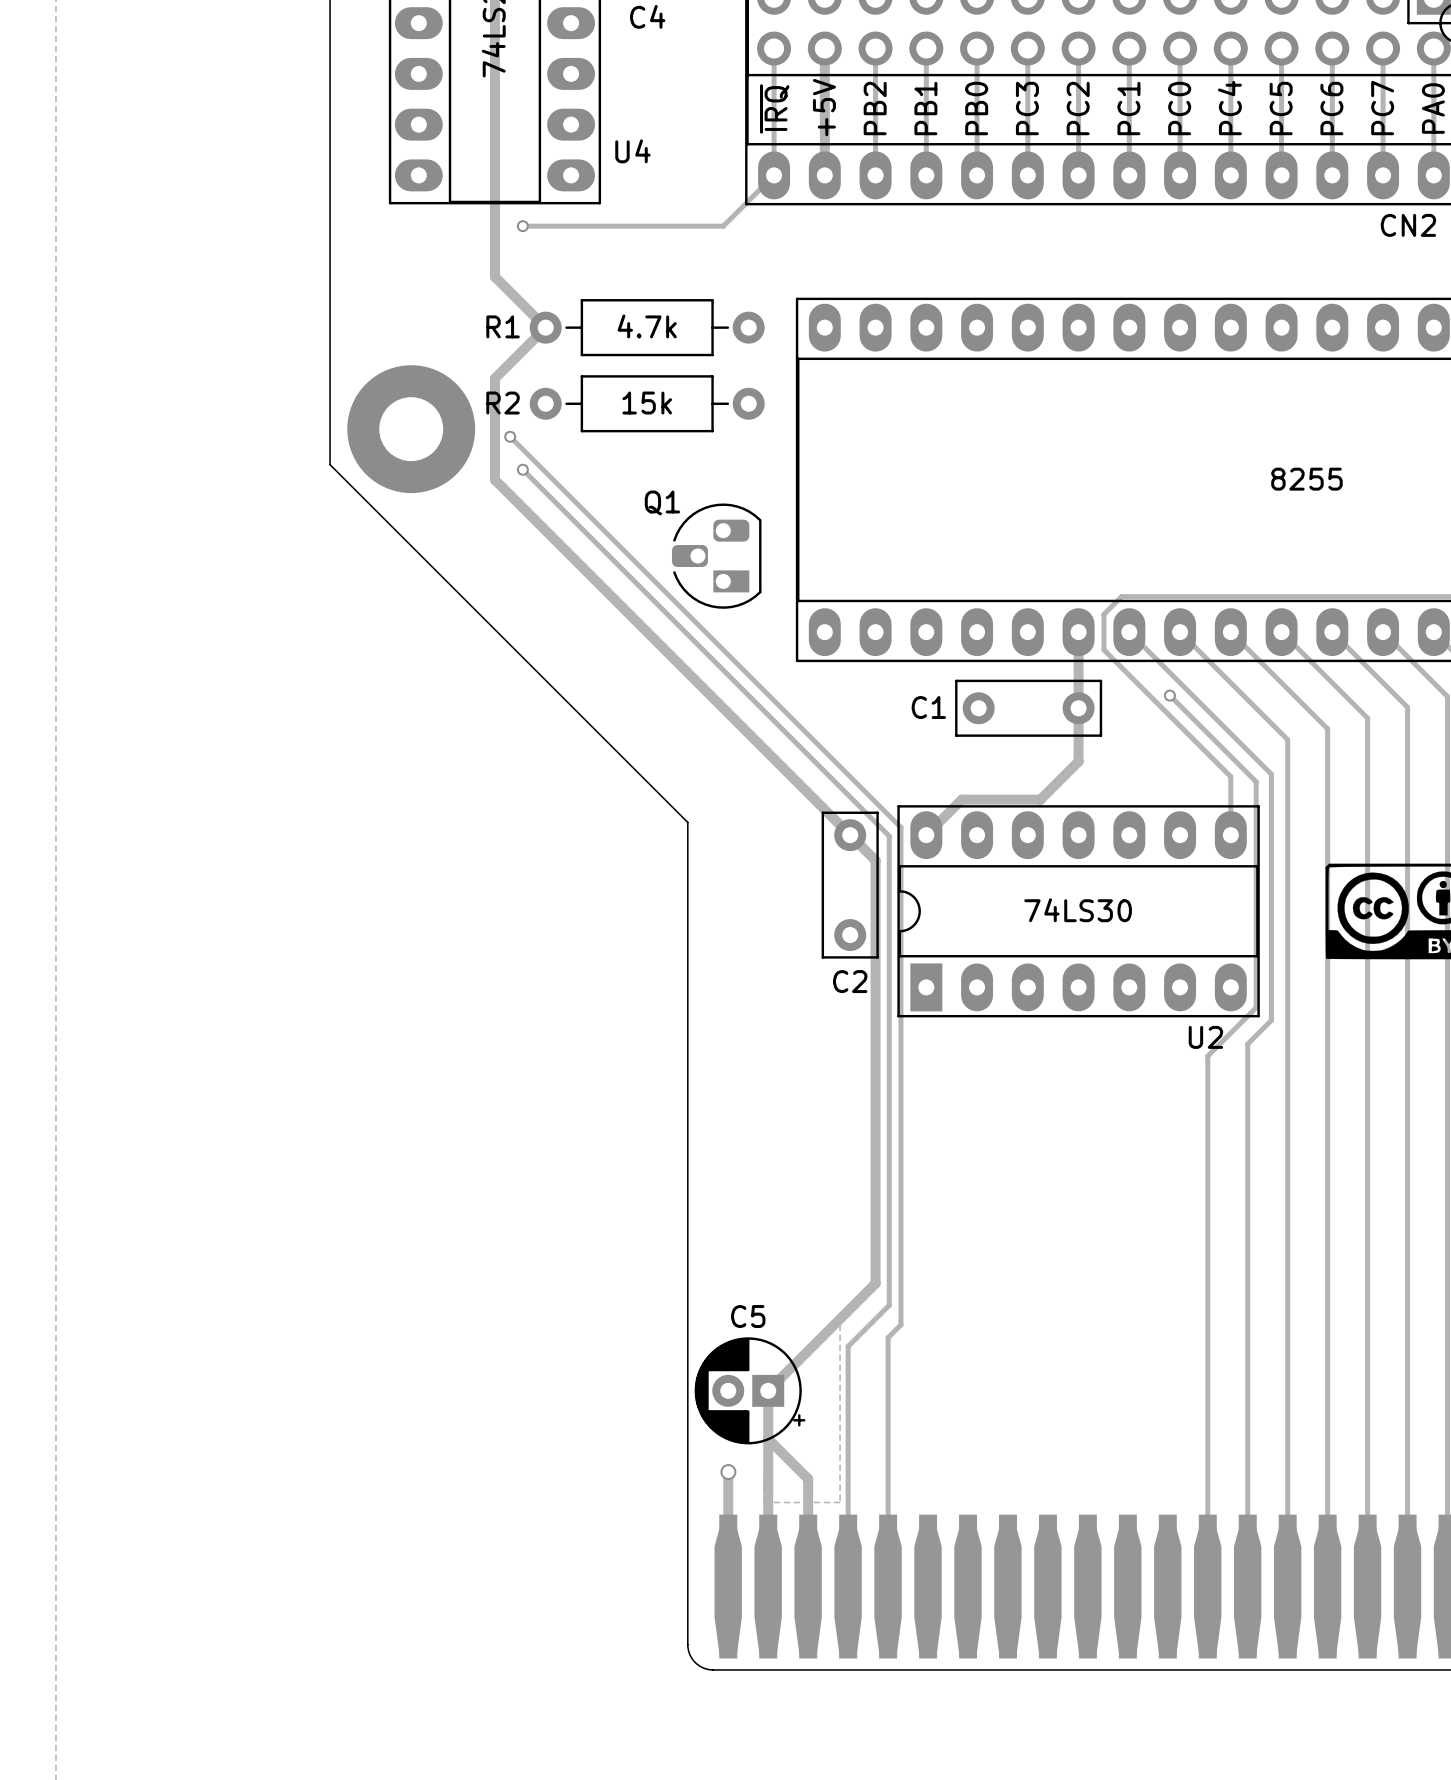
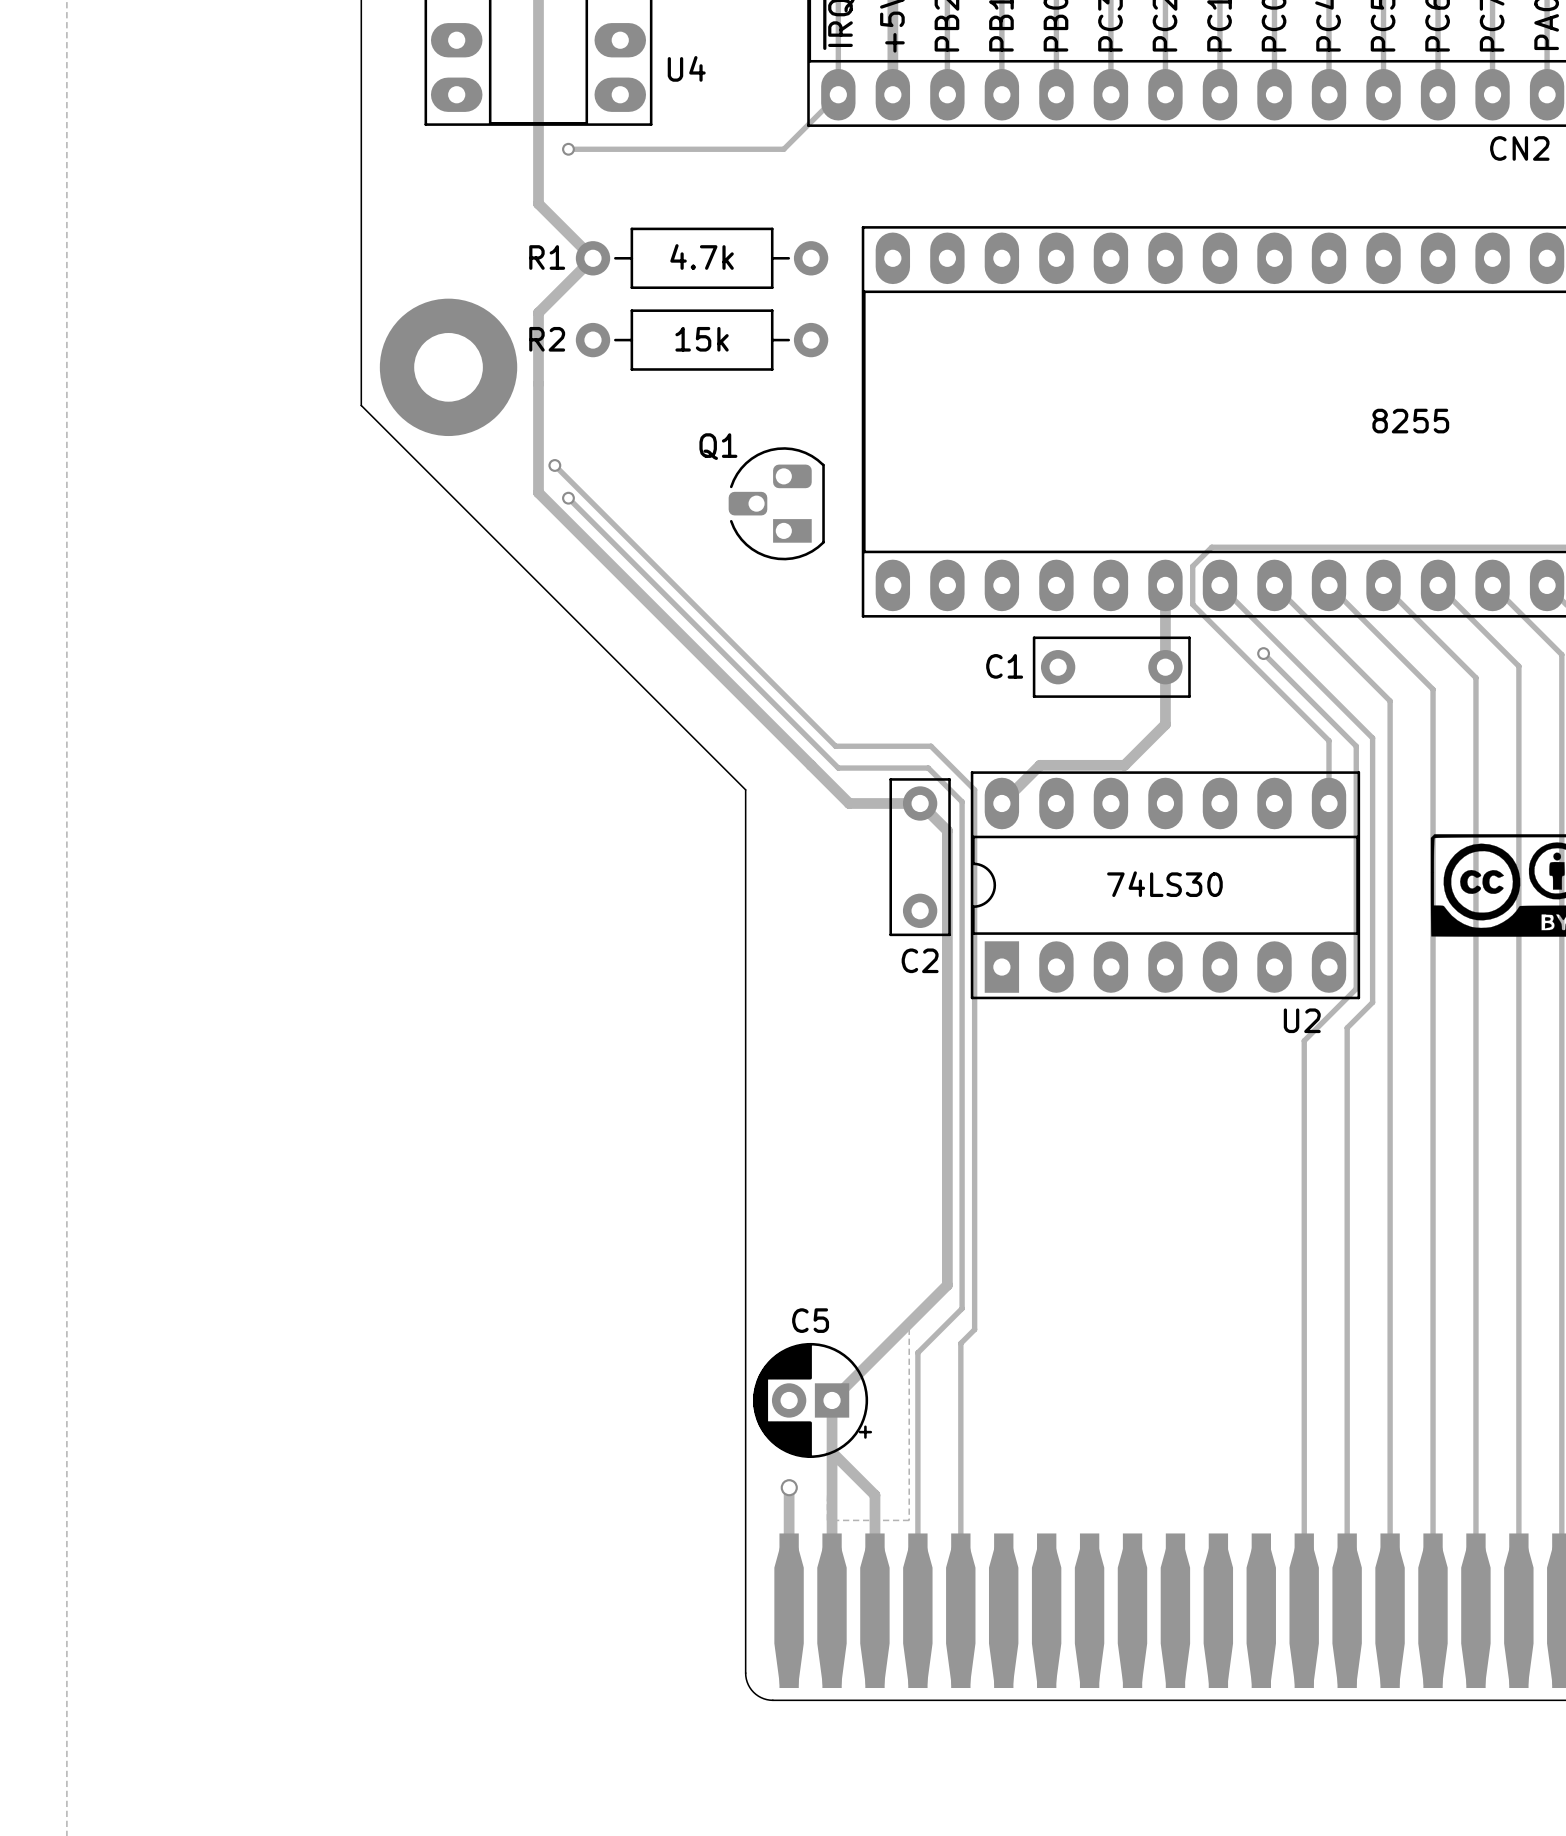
track: (510, 436) (900, 827) -> (554, 465) (835, 746) (931, 746) (974, 789) (974, 795)
via: (510, 436) -> none
track: (522, 469) (889, 836) -> (568, 498) (838, 768) (928, 768) (962, 801) (962, 804)
via: (522, 469) -> none
track: (494, 479) (850, 835) -> (538, 421) (538, 492) (849, 803) (920, 803)
via: none -> (554, 465)
via: none -> (568, 498)

